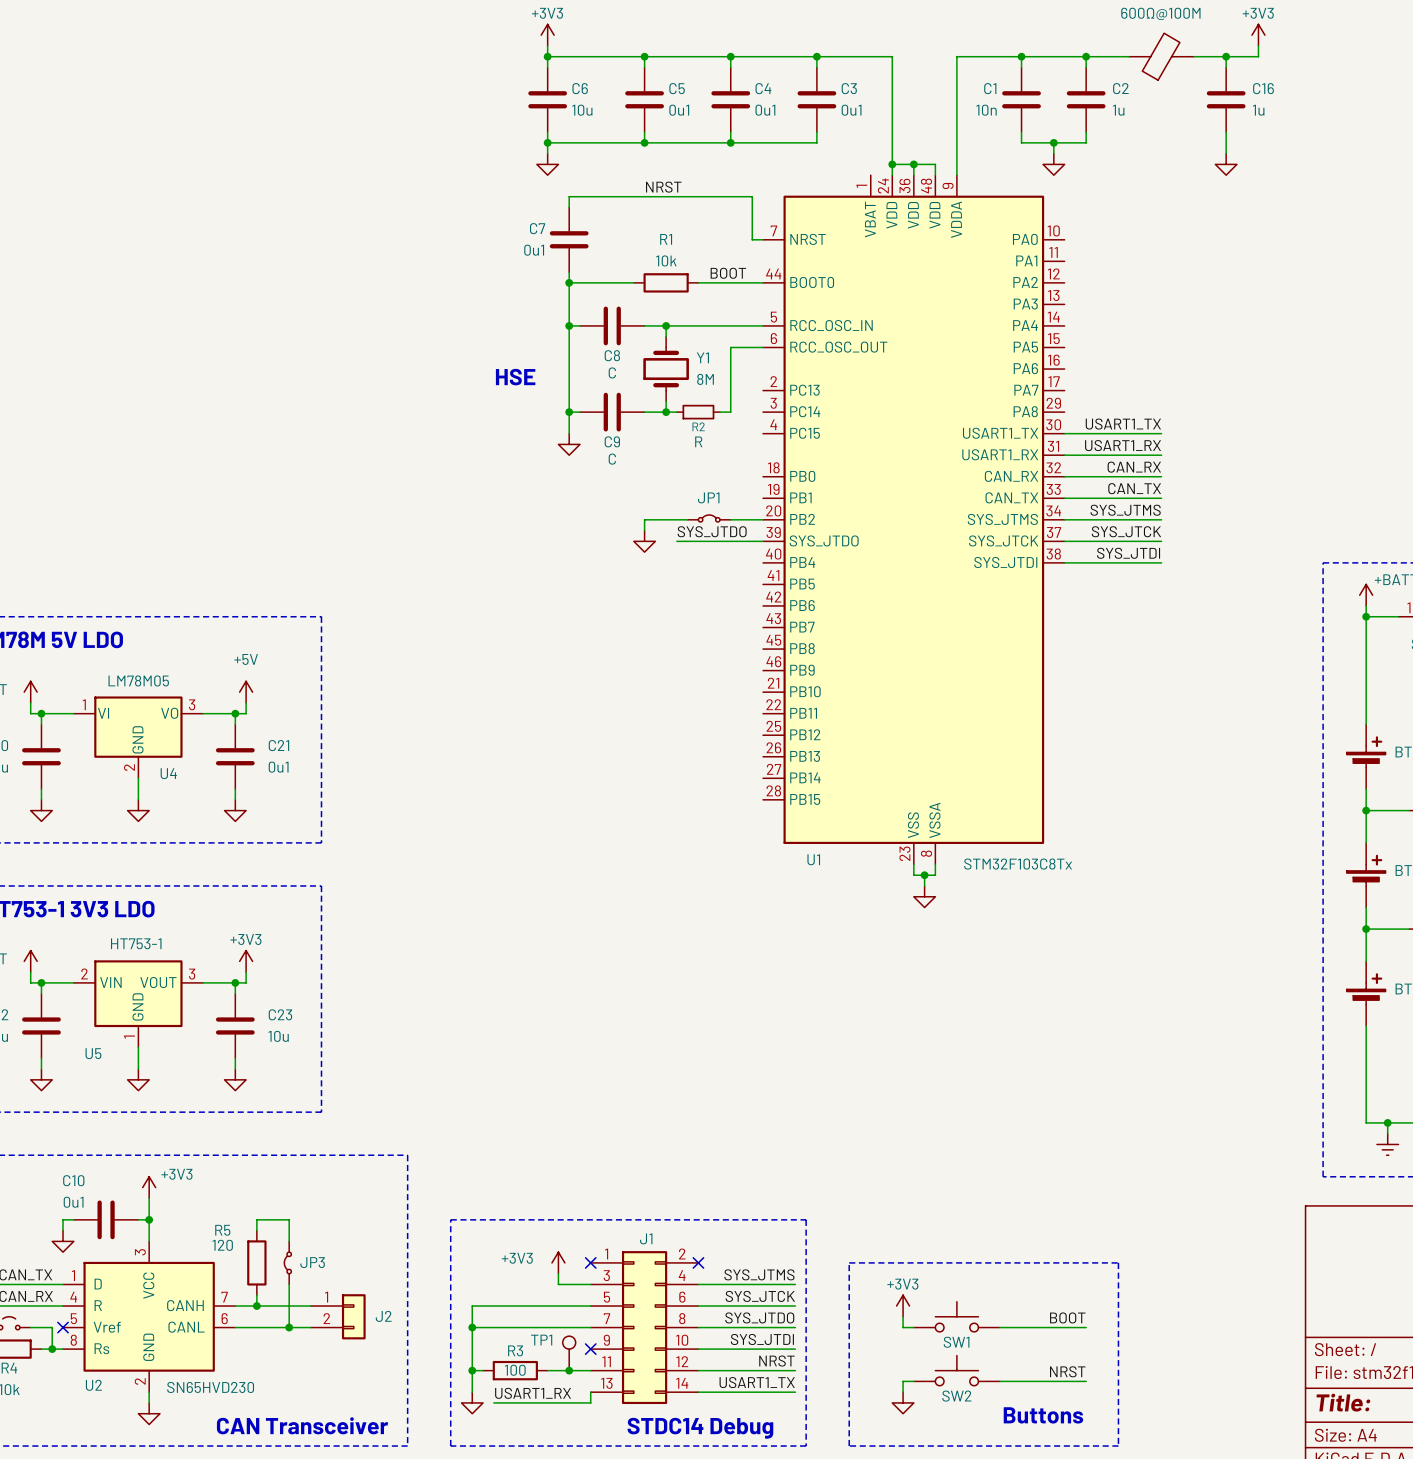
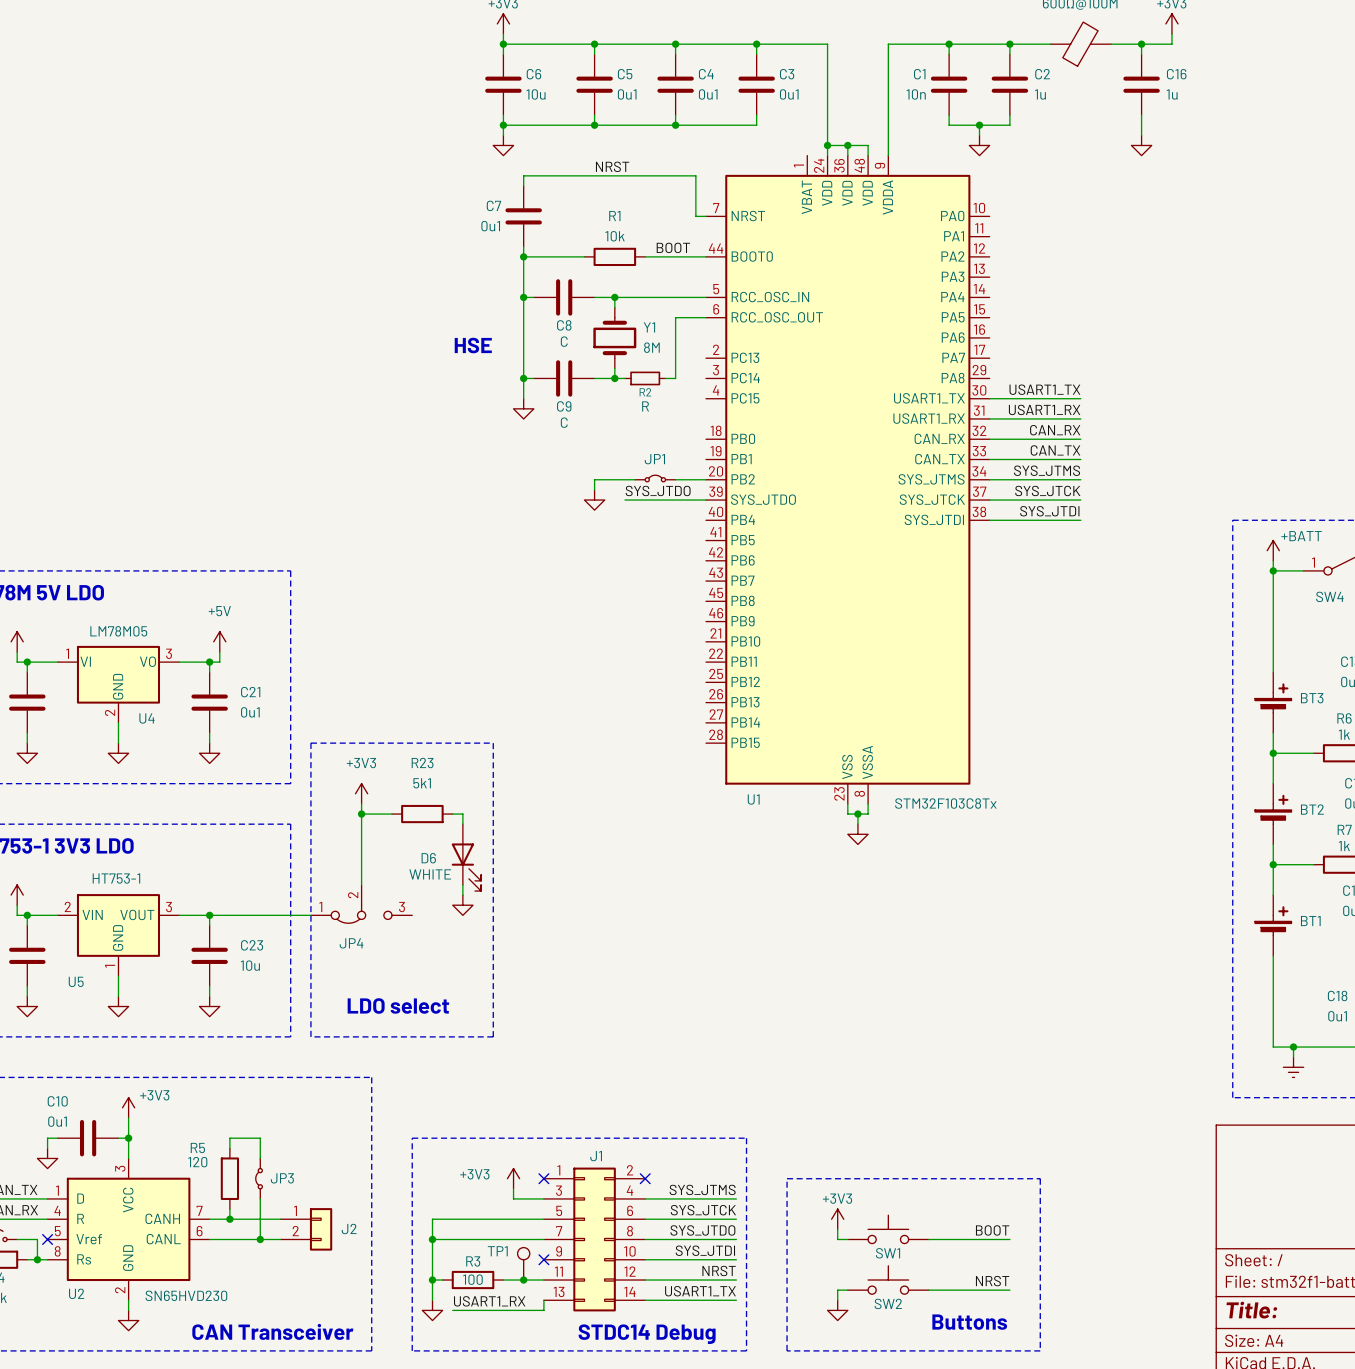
line: none -> (310, 743) (493, 743) (493, 1036) (310, 1036) (310, 743)
wire: none -> (361, 803) (361, 884)
wire: none -> (361, 814) (391, 814)
junction: none -> (361, 814)
R23: none -> 5k1 (422, 814)
wire: none -> (452, 814) (462, 814) (462, 824)
D6: none -> WHITE (466, 857)
power symbol text position: +3V3 (245, 939) -> +3V3 (361, 763)
wire: none -> (462, 884) (462, 895)
power symbol position: +3V3 (246, 961) -> +3V3 (361, 793)
JP4: none -> (361, 904)
wire: (246, 972) (246, 982) -> (310, 915) (219, 915)
power symbol: none -> (462, 905)
text: none -> LDO select (398, 1006)

